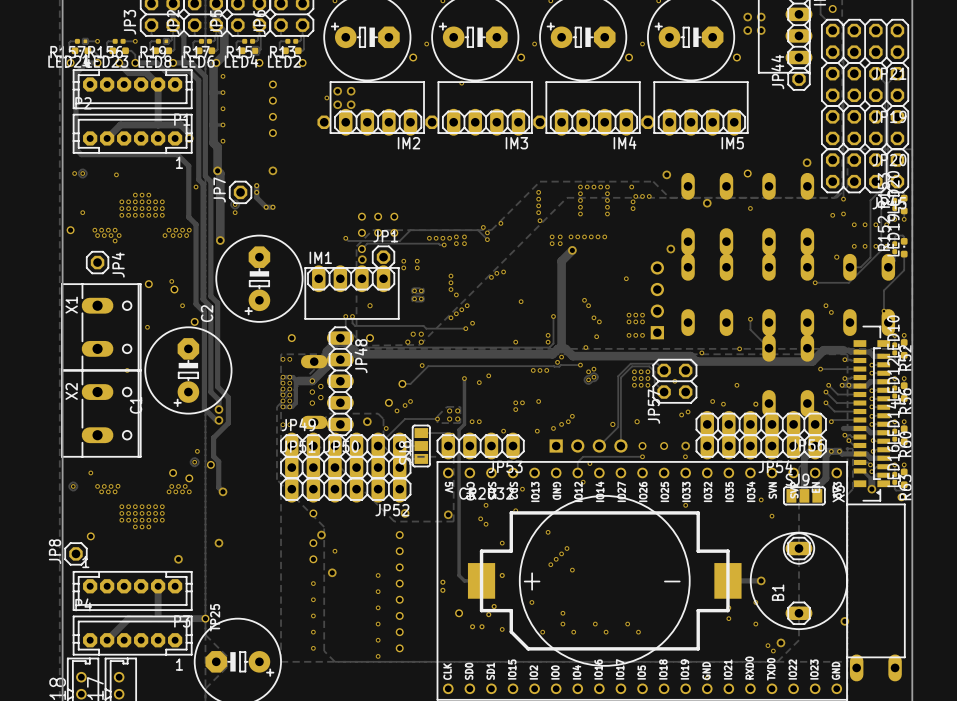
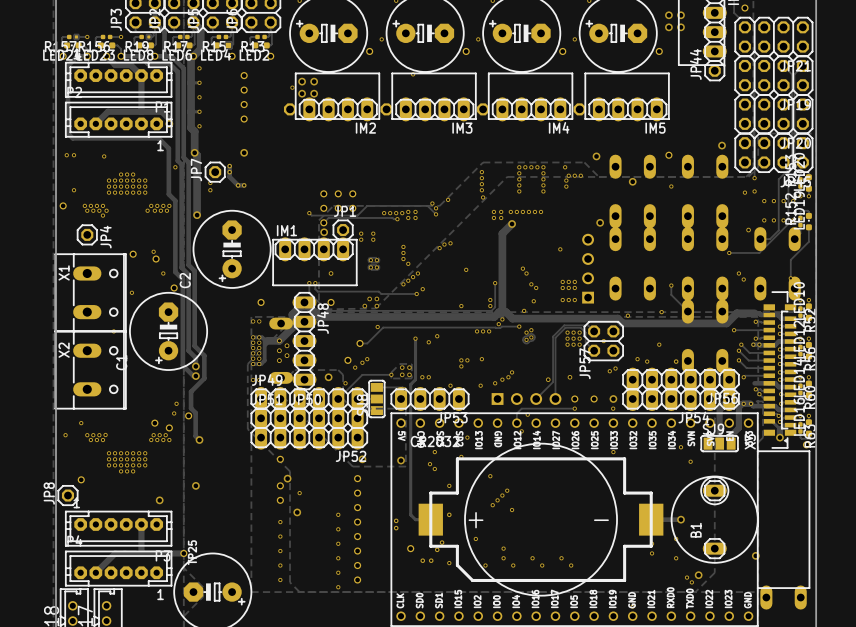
zone outline: (84, 169) (78, 172) (81, 177) (86, 174) (84, 169) -> none
zone outline: (236, 200) (231, 203) (233, 208) (239, 205) (236, 200) -> none
zone outline: (196, 458) (190, 460) (193, 466) (198, 463) (196, 458) -> none
zone outline: (74, 482) (69, 485) (71, 490) (77, 487) (74, 482) -> none

